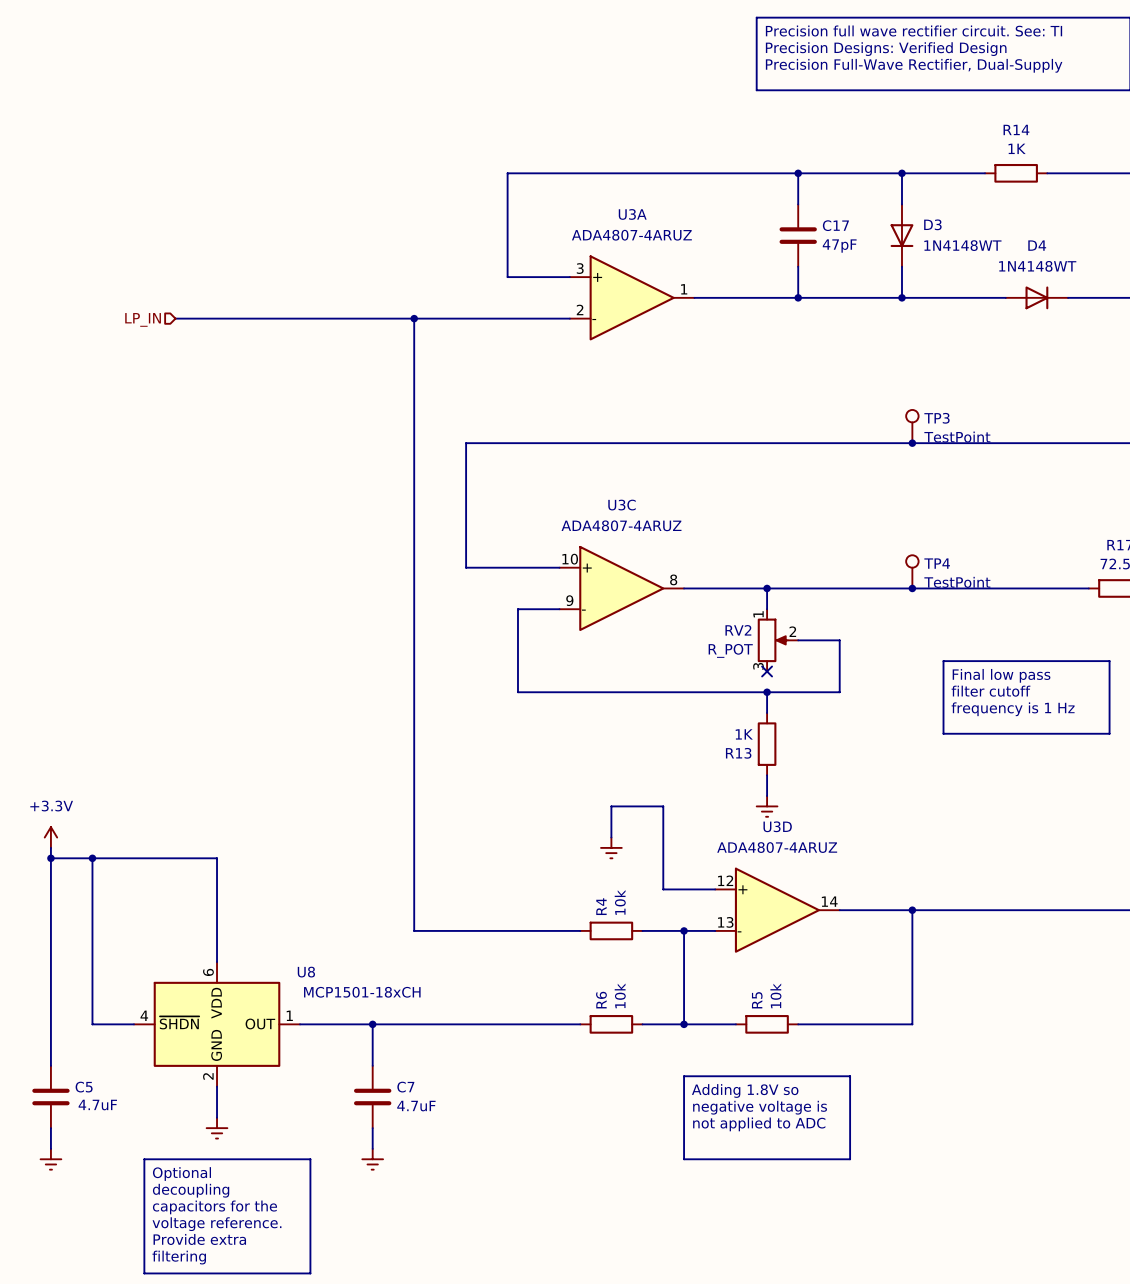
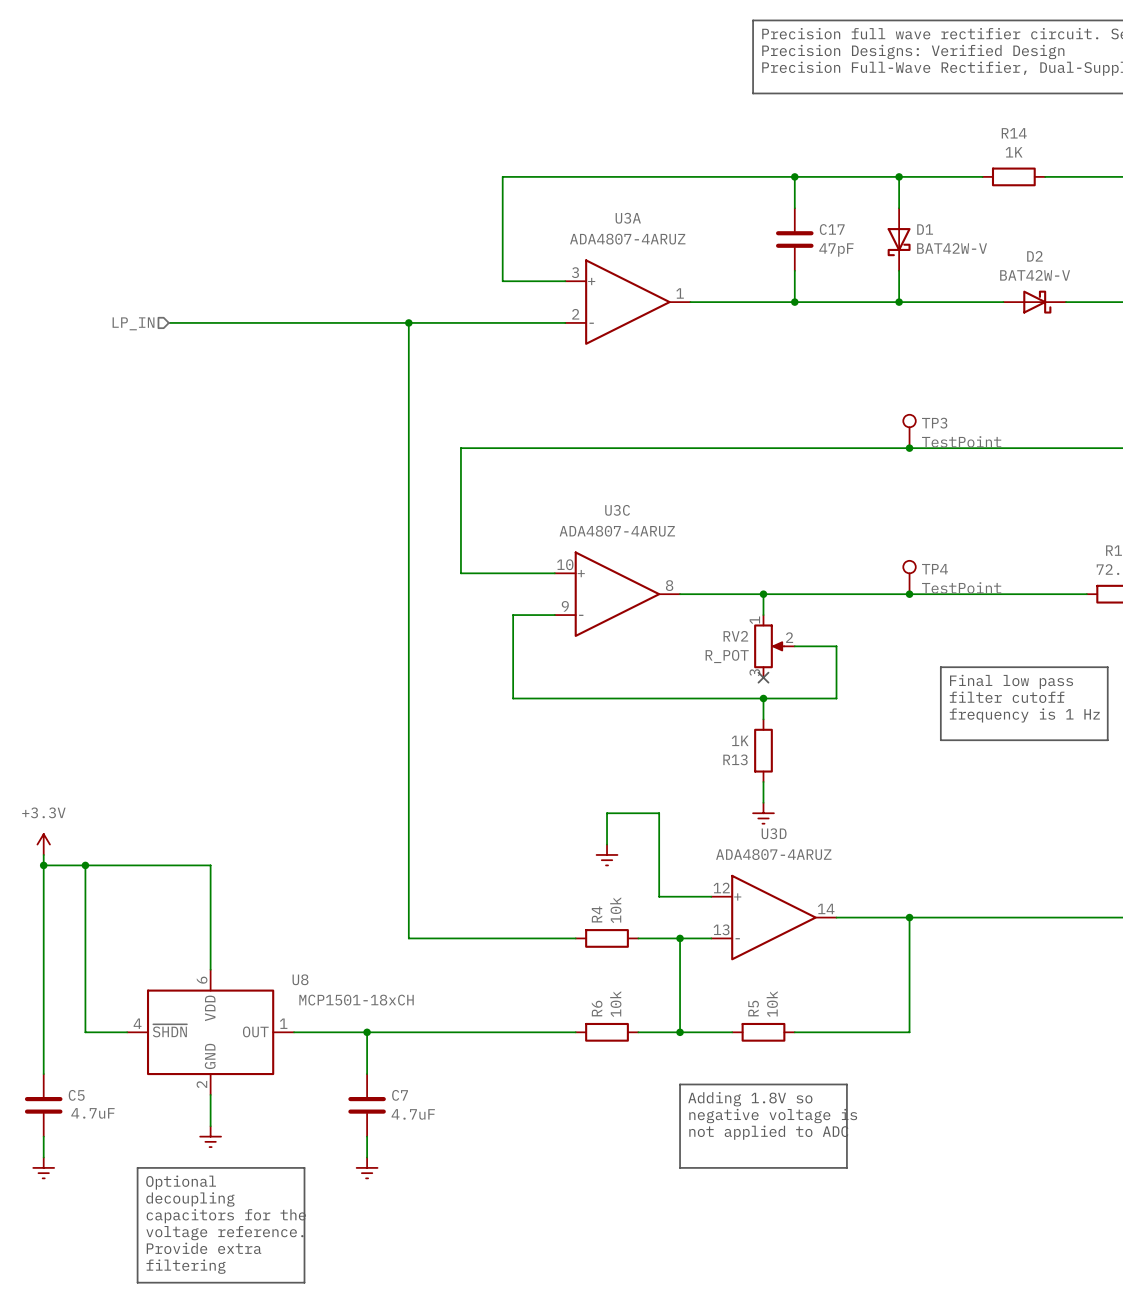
D3: 1N4148WT (901, 235) -> none
D1: none -> BAT42W-V (899, 239)
D4: 1N4148WT (1036, 297) -> none
D2: none -> BAT42W-V (1034, 302)

